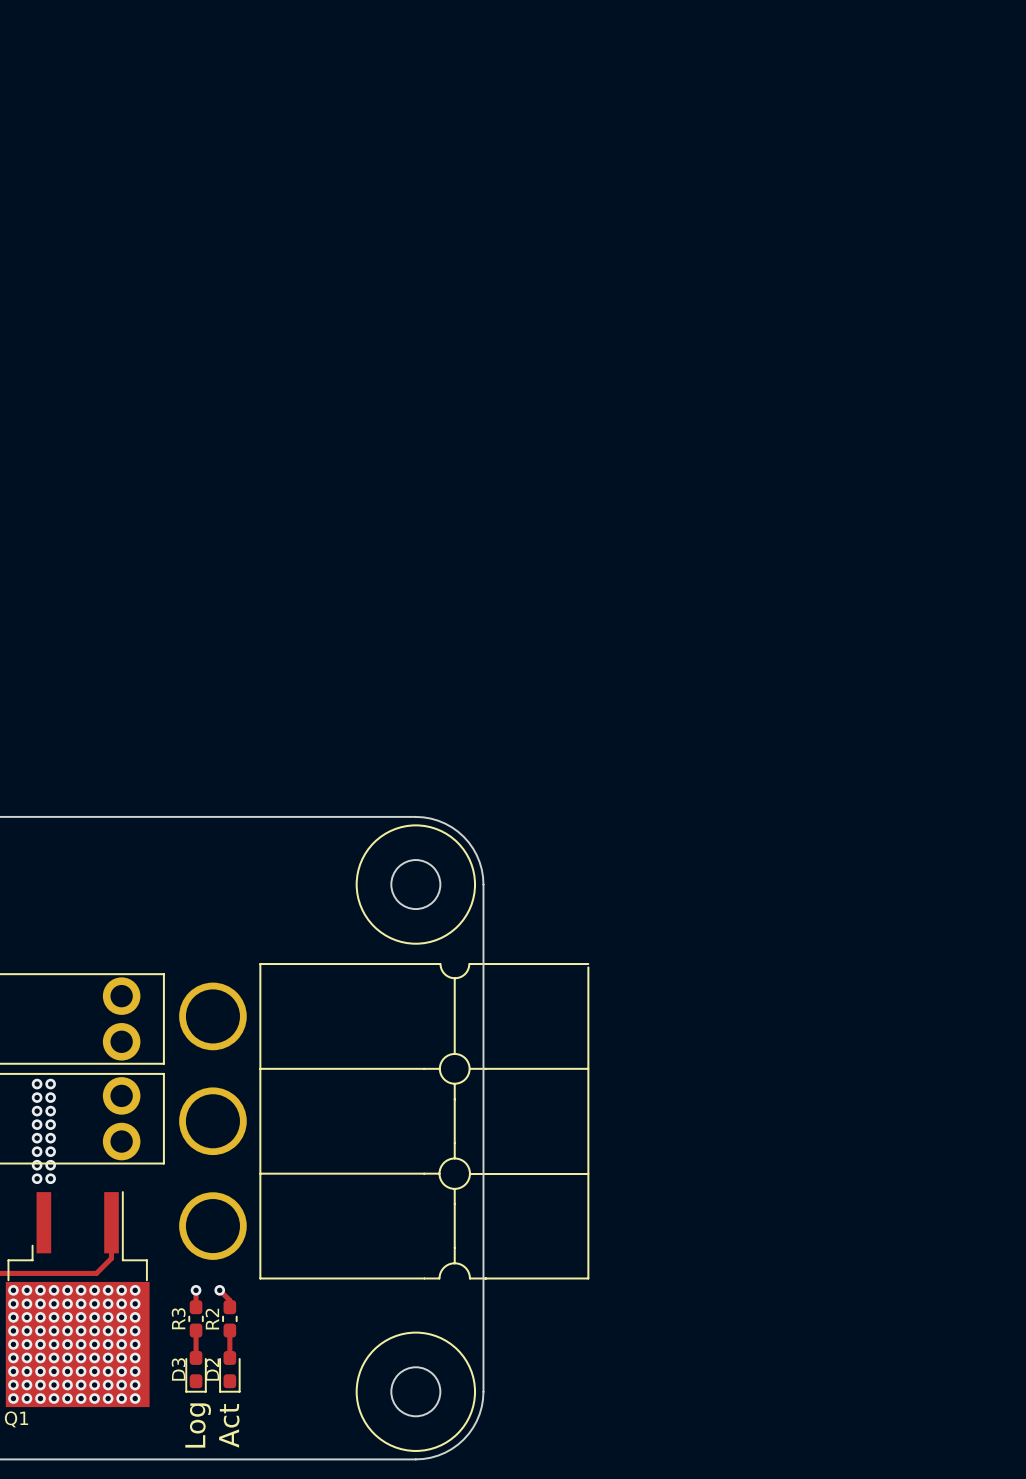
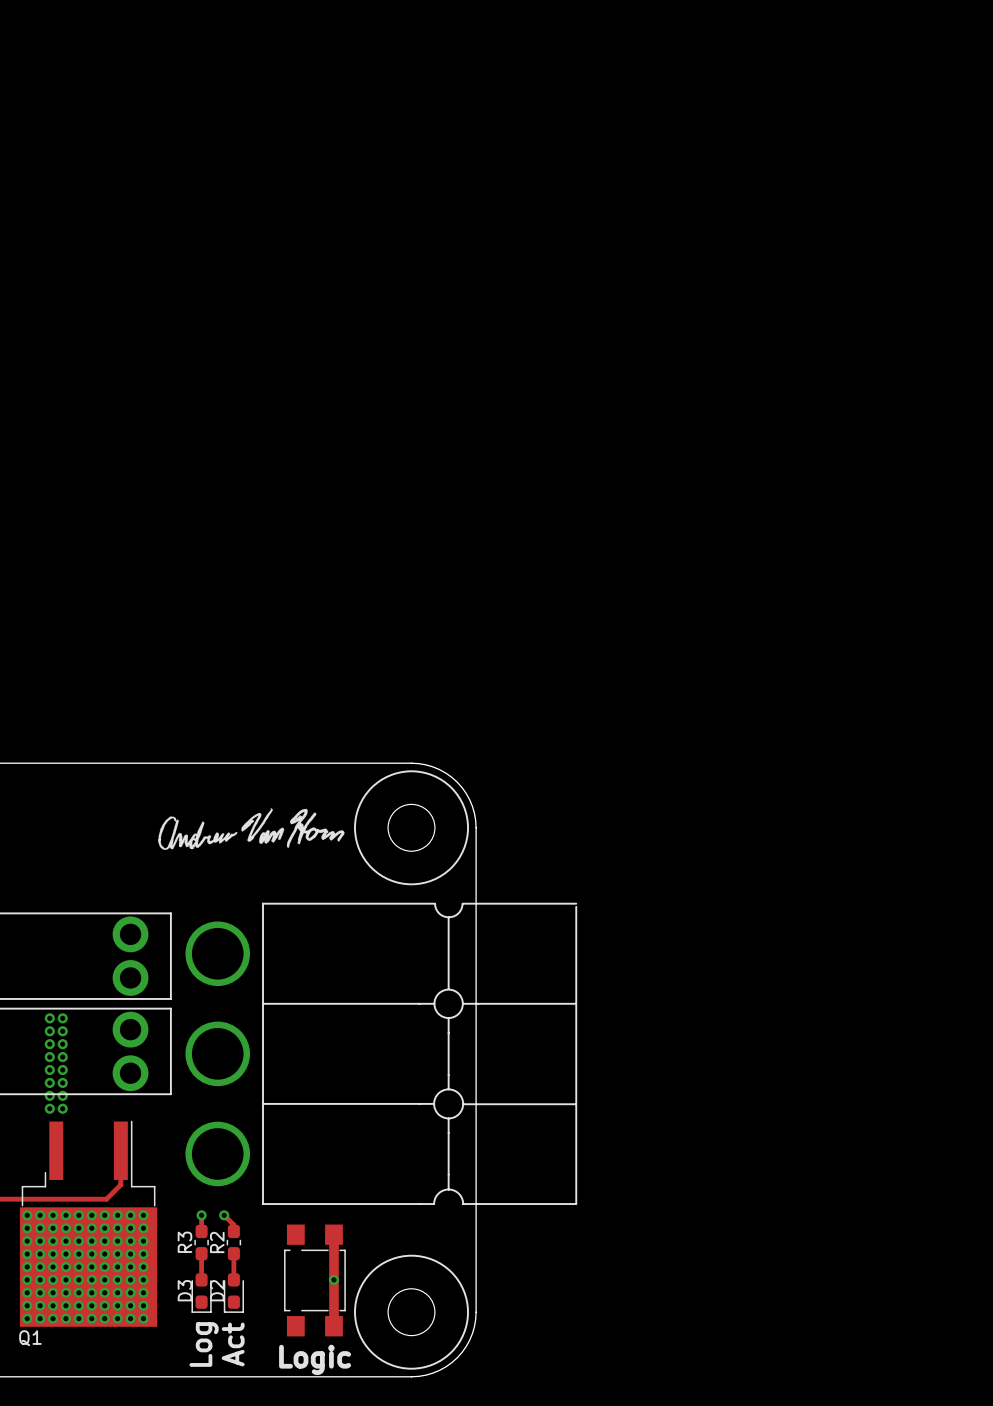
drawing: none -> [157, 808, 345, 850]
track: none -> (334, 1234) (334, 1326)
via: none -> (334, 1279)
Logic: none -> (314, 1280)

